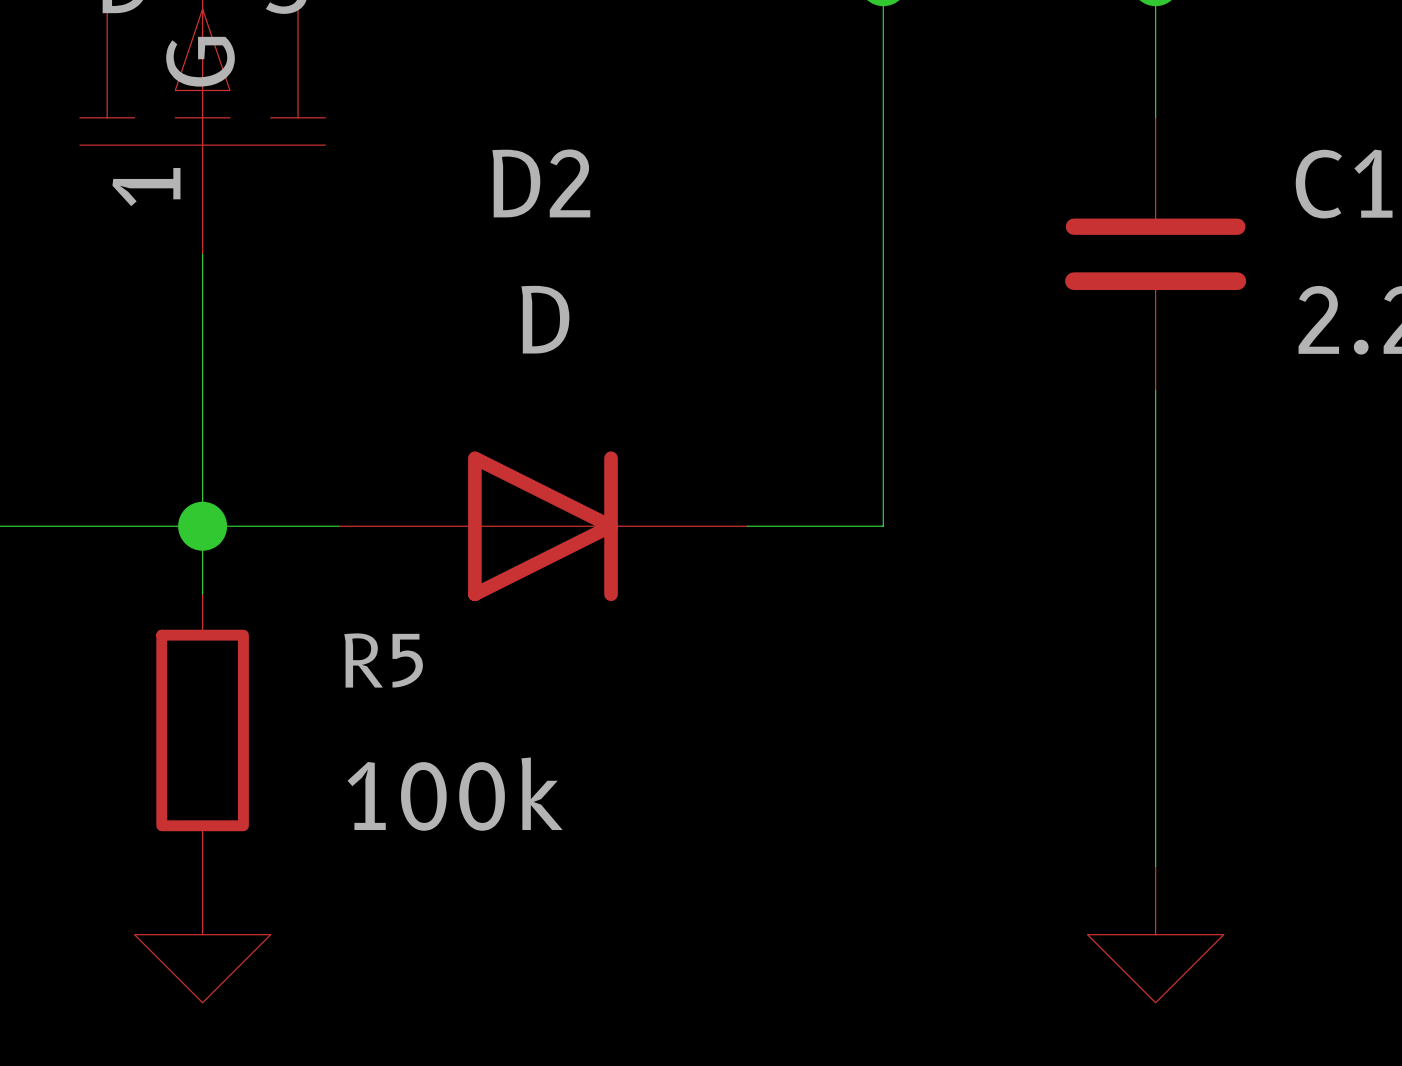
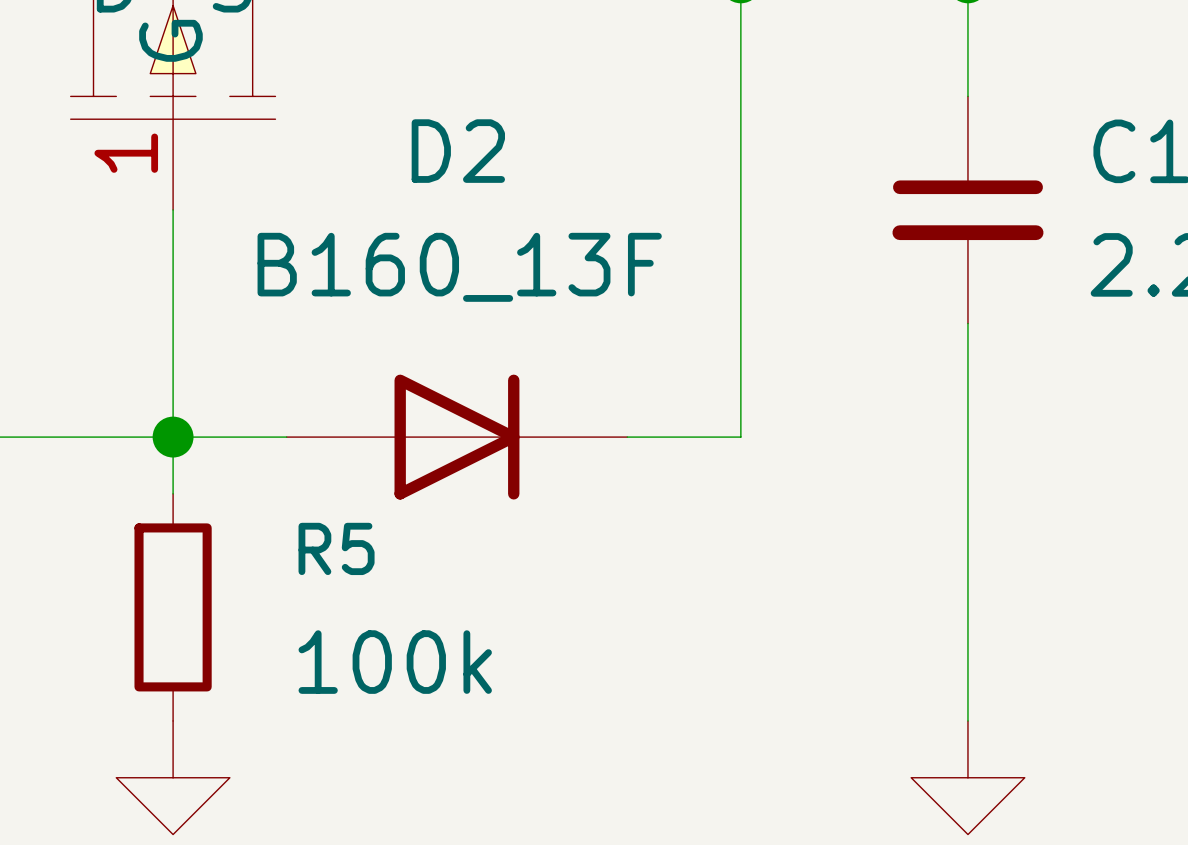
D2 value: D (545, 319) -> B160_13F (459, 267)

